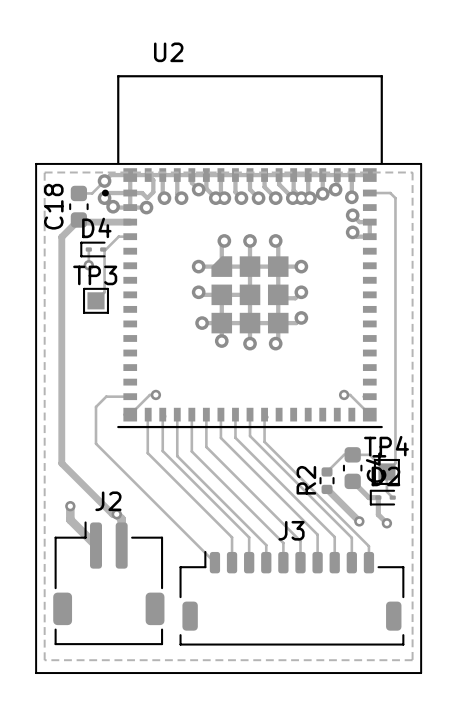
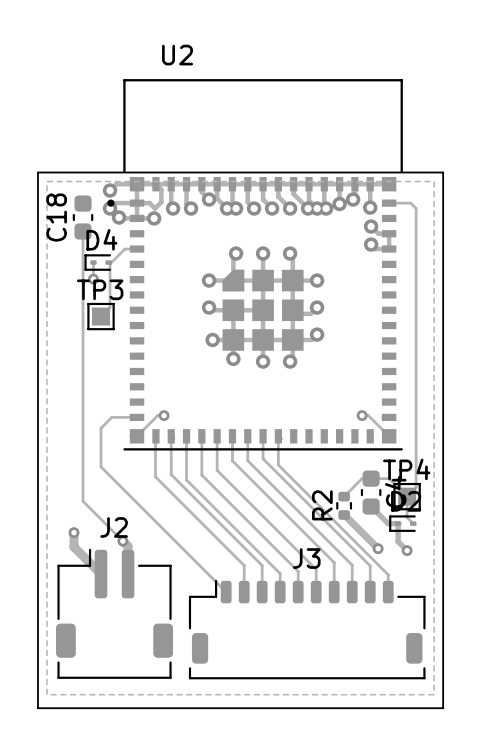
track: (104, 181) (92, 193) (78, 193) -> none
track: (130, 222) (81, 222) (78, 219) (61, 237) (61, 463) (112, 514) (116, 514) -> (85, 233) (83, 231) (83, 501) (122, 541)

